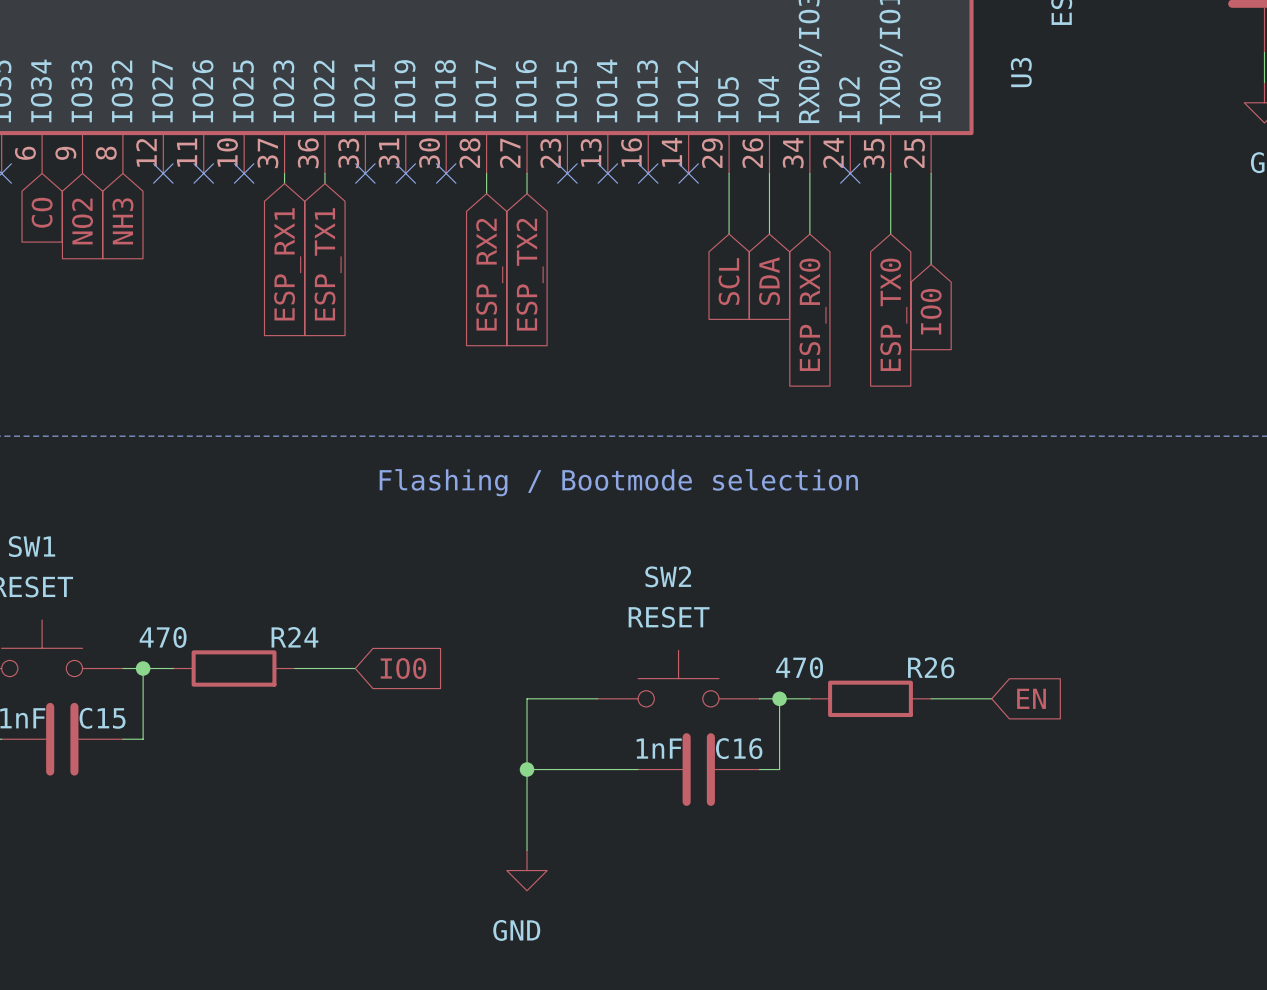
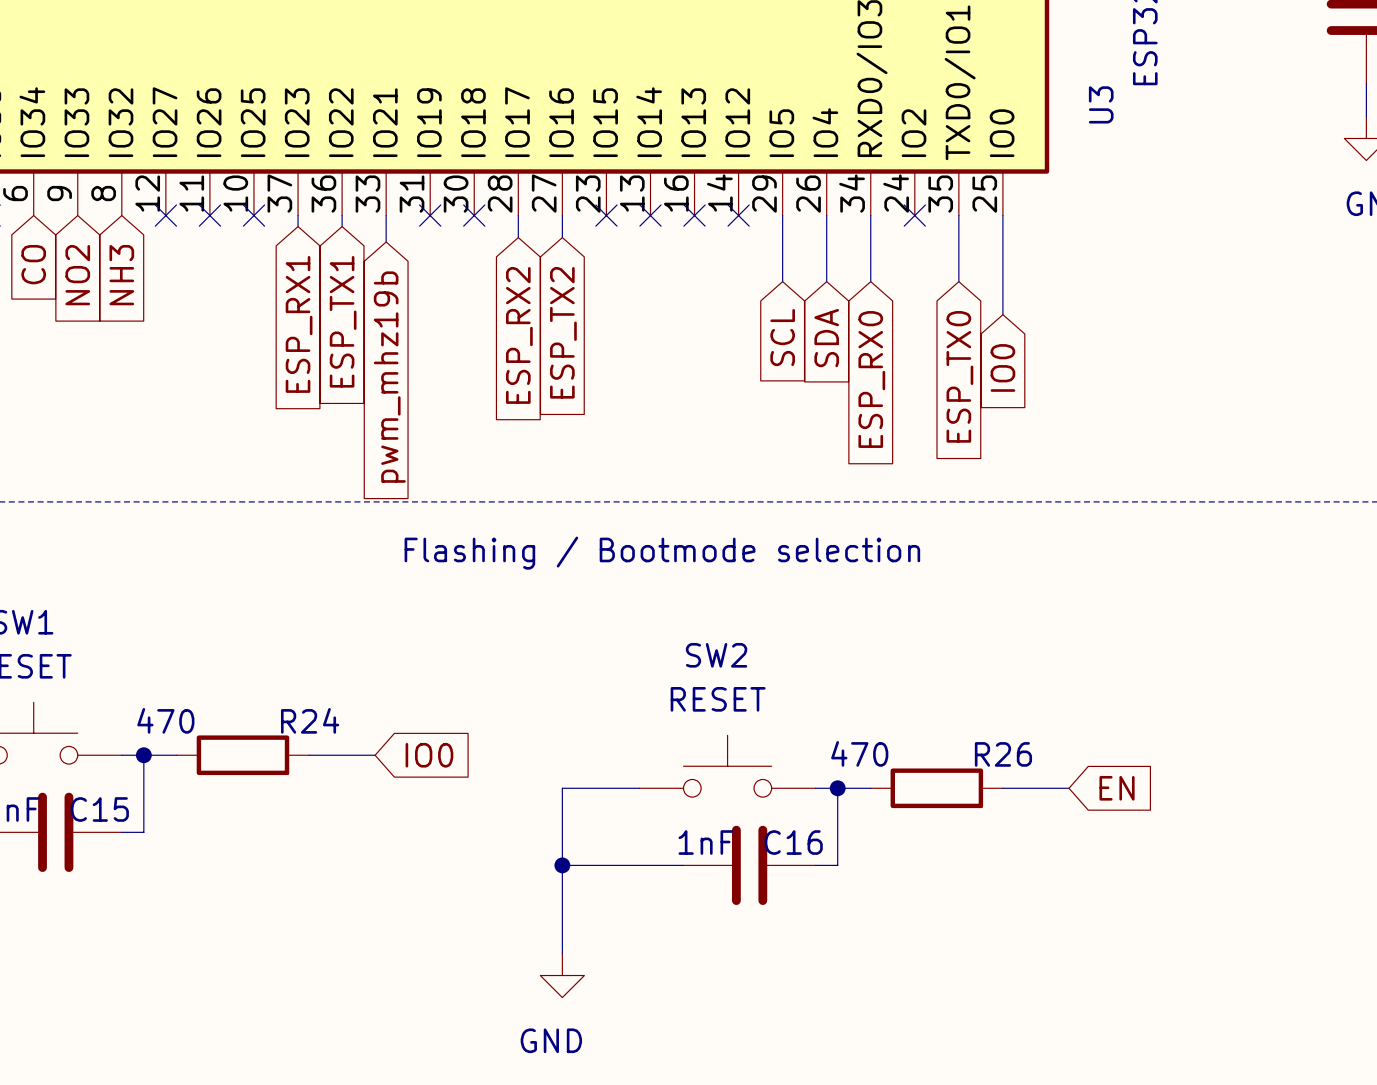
wire: none -> (386, 215) (386, 242)
no-connect mark: (365, 173) -> none
global label: none -> pwm_mhz19b (389, 377)

